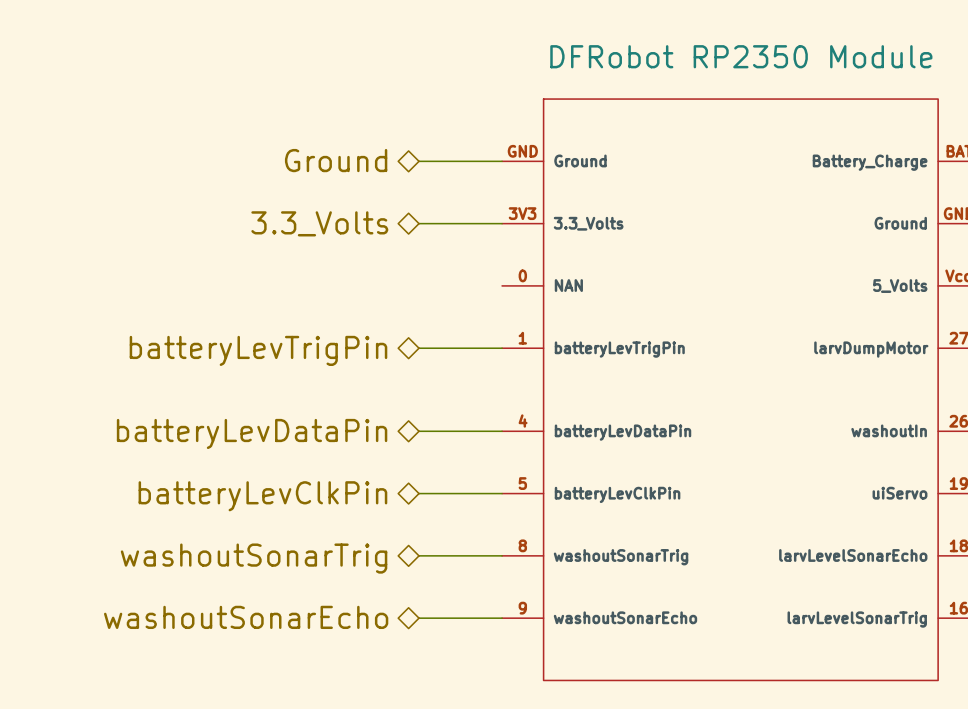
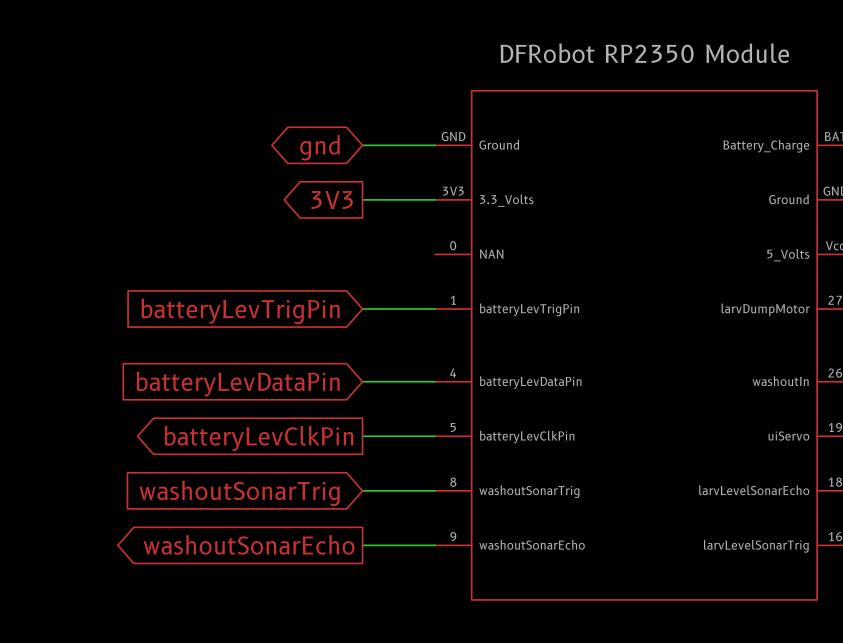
hierarchical label: Ground (336, 160) -> none
global label: none -> gnd (320, 147)
hierarchical label: 3.3_Volts (319, 223) -> none
global label: none -> 3V3 (332, 200)
hierarchical label: batteryLevTrigPin (258, 350) -> none
global label: none -> batteryLevTrigPin (240, 311)
hierarchical label: batteryLevDataPin (252, 433) -> none
global label: none -> batteryLevDataPin (238, 384)
hierarchical label: batteryLevClkPin (262, 496) -> none
global label: none -> batteryLevClkPin (259, 438)
hierarchical label: washoutSonarTrig (254, 558) -> none
global label: none -> washoutSonarTrig (239, 493)
hierarchical label: washoutSonarEcho (246, 617) -> none
global label: none -> washoutSonarEcho (249, 544)

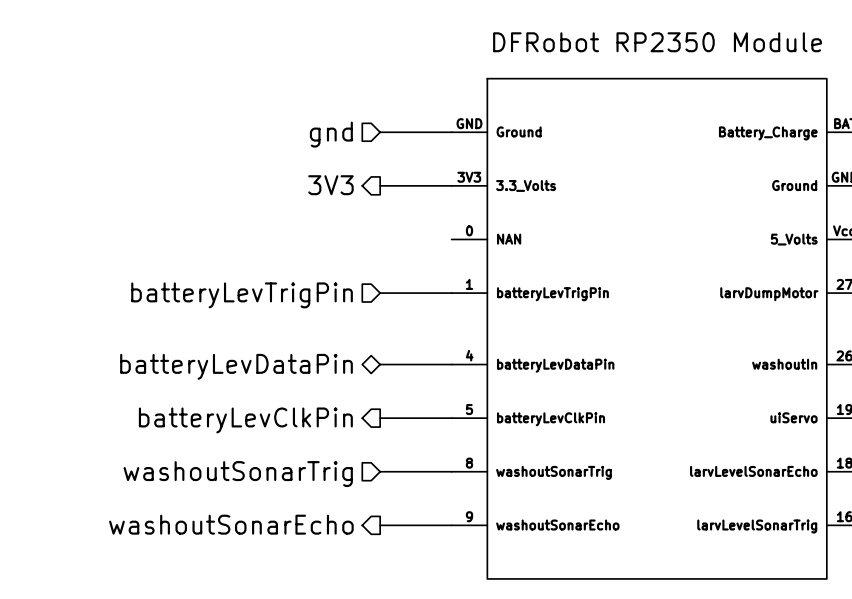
hierarchical label: none -> gnd (331, 134)
global label: gnd (320, 147) -> none
hierarchical label: none -> 3V3 (330, 185)
global label: 3V3 (332, 200) -> none
hierarchical label: none -> batteryLevTrigPin (242, 295)
global label: batteryLevTrigPin (240, 311) -> none
hierarchical label: none -> batteryLevDataPin (236, 366)
global label: batteryLevDataPin (238, 384) -> none
hierarchical label: none -> batteryLevClkPin (245, 420)
global label: batteryLevClkPin (259, 438) -> none
hierarchical label: none -> washoutSonarTrig (238, 474)
global label: washoutSonarTrig (239, 493) -> none
hierarchical label: none -> washoutSonarEcho (231, 524)
global label: washoutSonarEcho (249, 544) -> none

